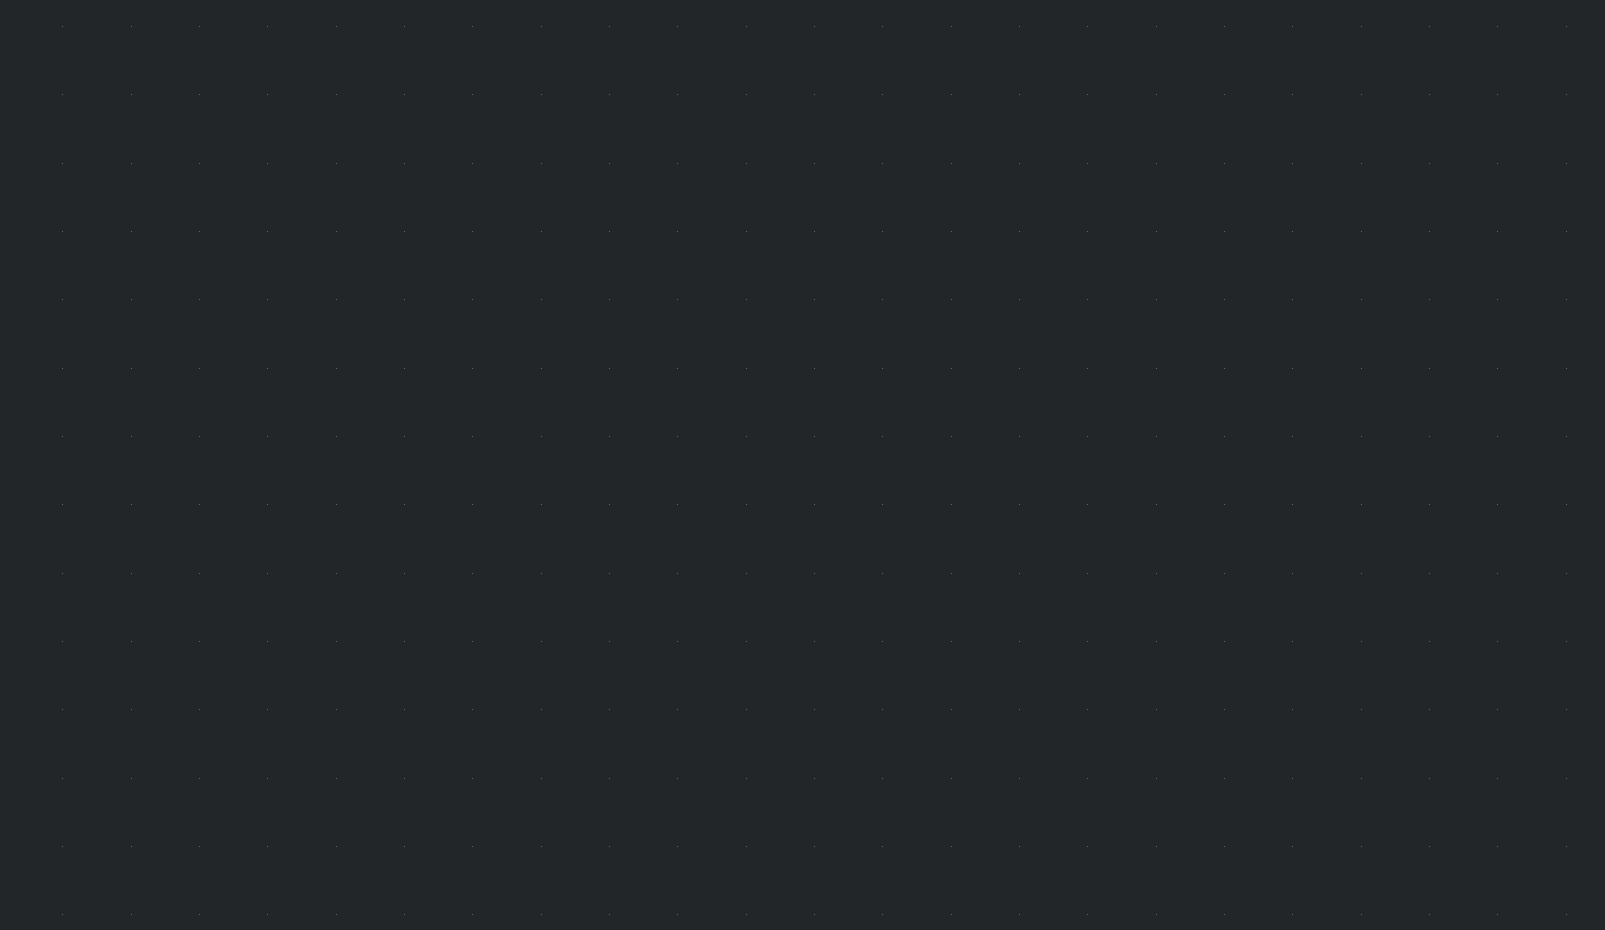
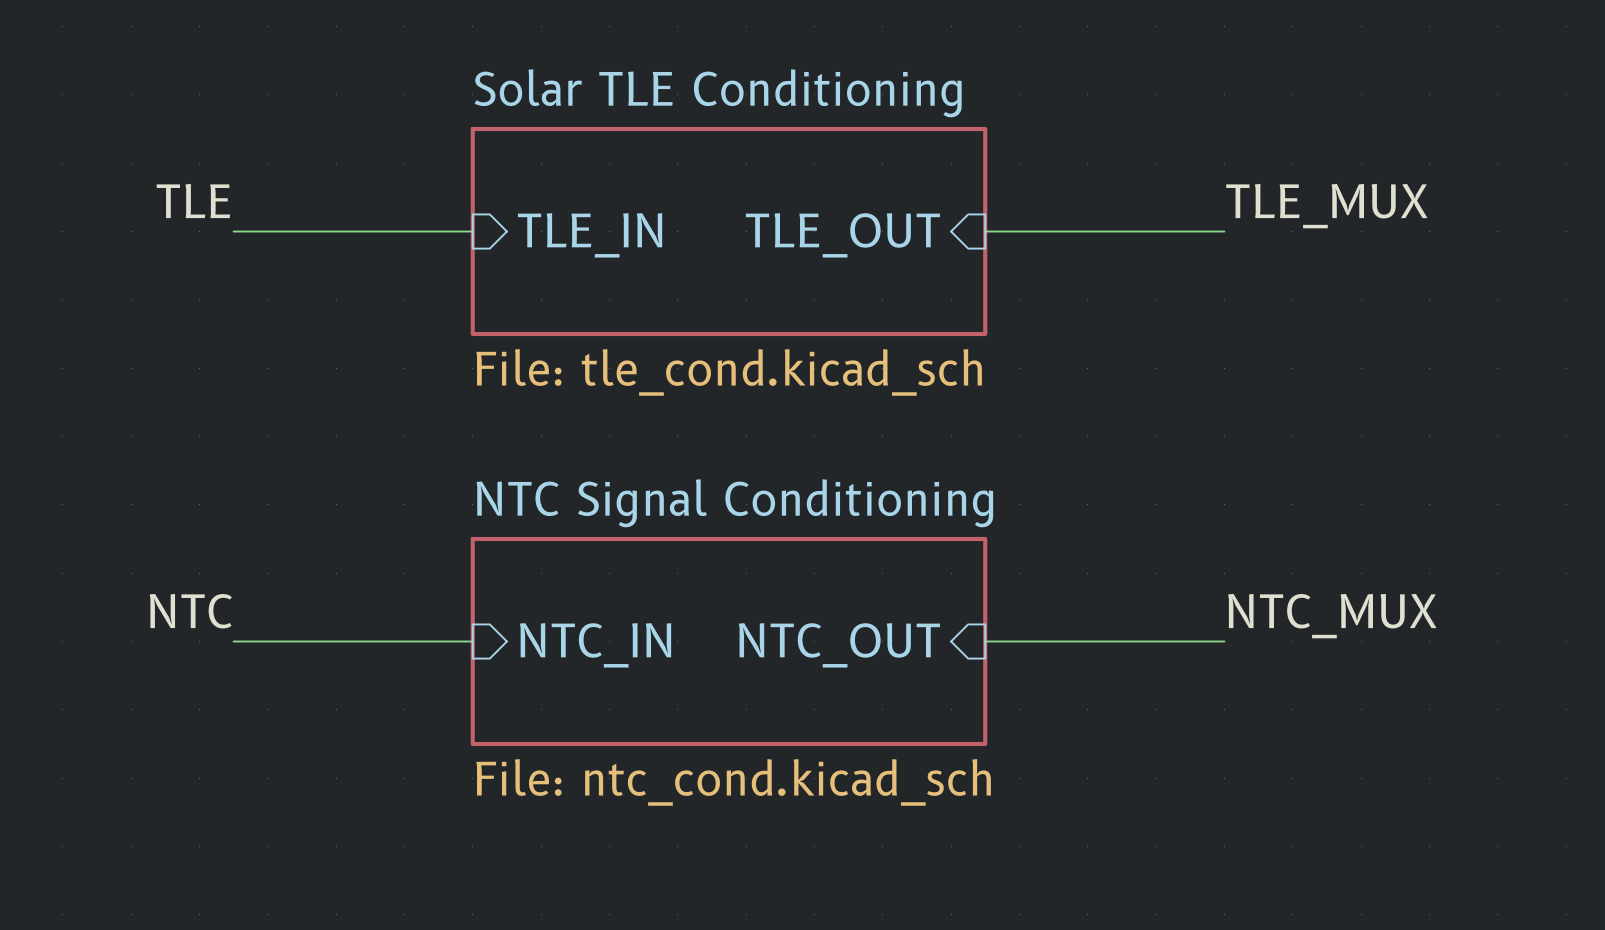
label: none -> TLE (193, 201)
label: none -> TLE_MUX (1326, 206)
wire: none -> (233, 231) (472, 231)
sheet Solar TLE Conditioning: none -> File: tle_cond.kicad_sch (729, 231)
wire: none -> (985, 231) (1224, 231)
sheet pin: none -> TLE_IN (590, 235)
sheet pin: none -> TLE_OUT (842, 235)
label: none -> NTC (190, 611)
label: none -> NTC_MUX (1332, 616)
wire: none -> (233, 641) (472, 641)
sheet NTC Signal Conditioning: none -> File: ntc_cond.kicad_sch (729, 641)
wire: none -> (985, 641) (1224, 641)
sheet pin: none -> NTC_IN (595, 645)
sheet pin: none -> NTC_OUT (839, 645)

